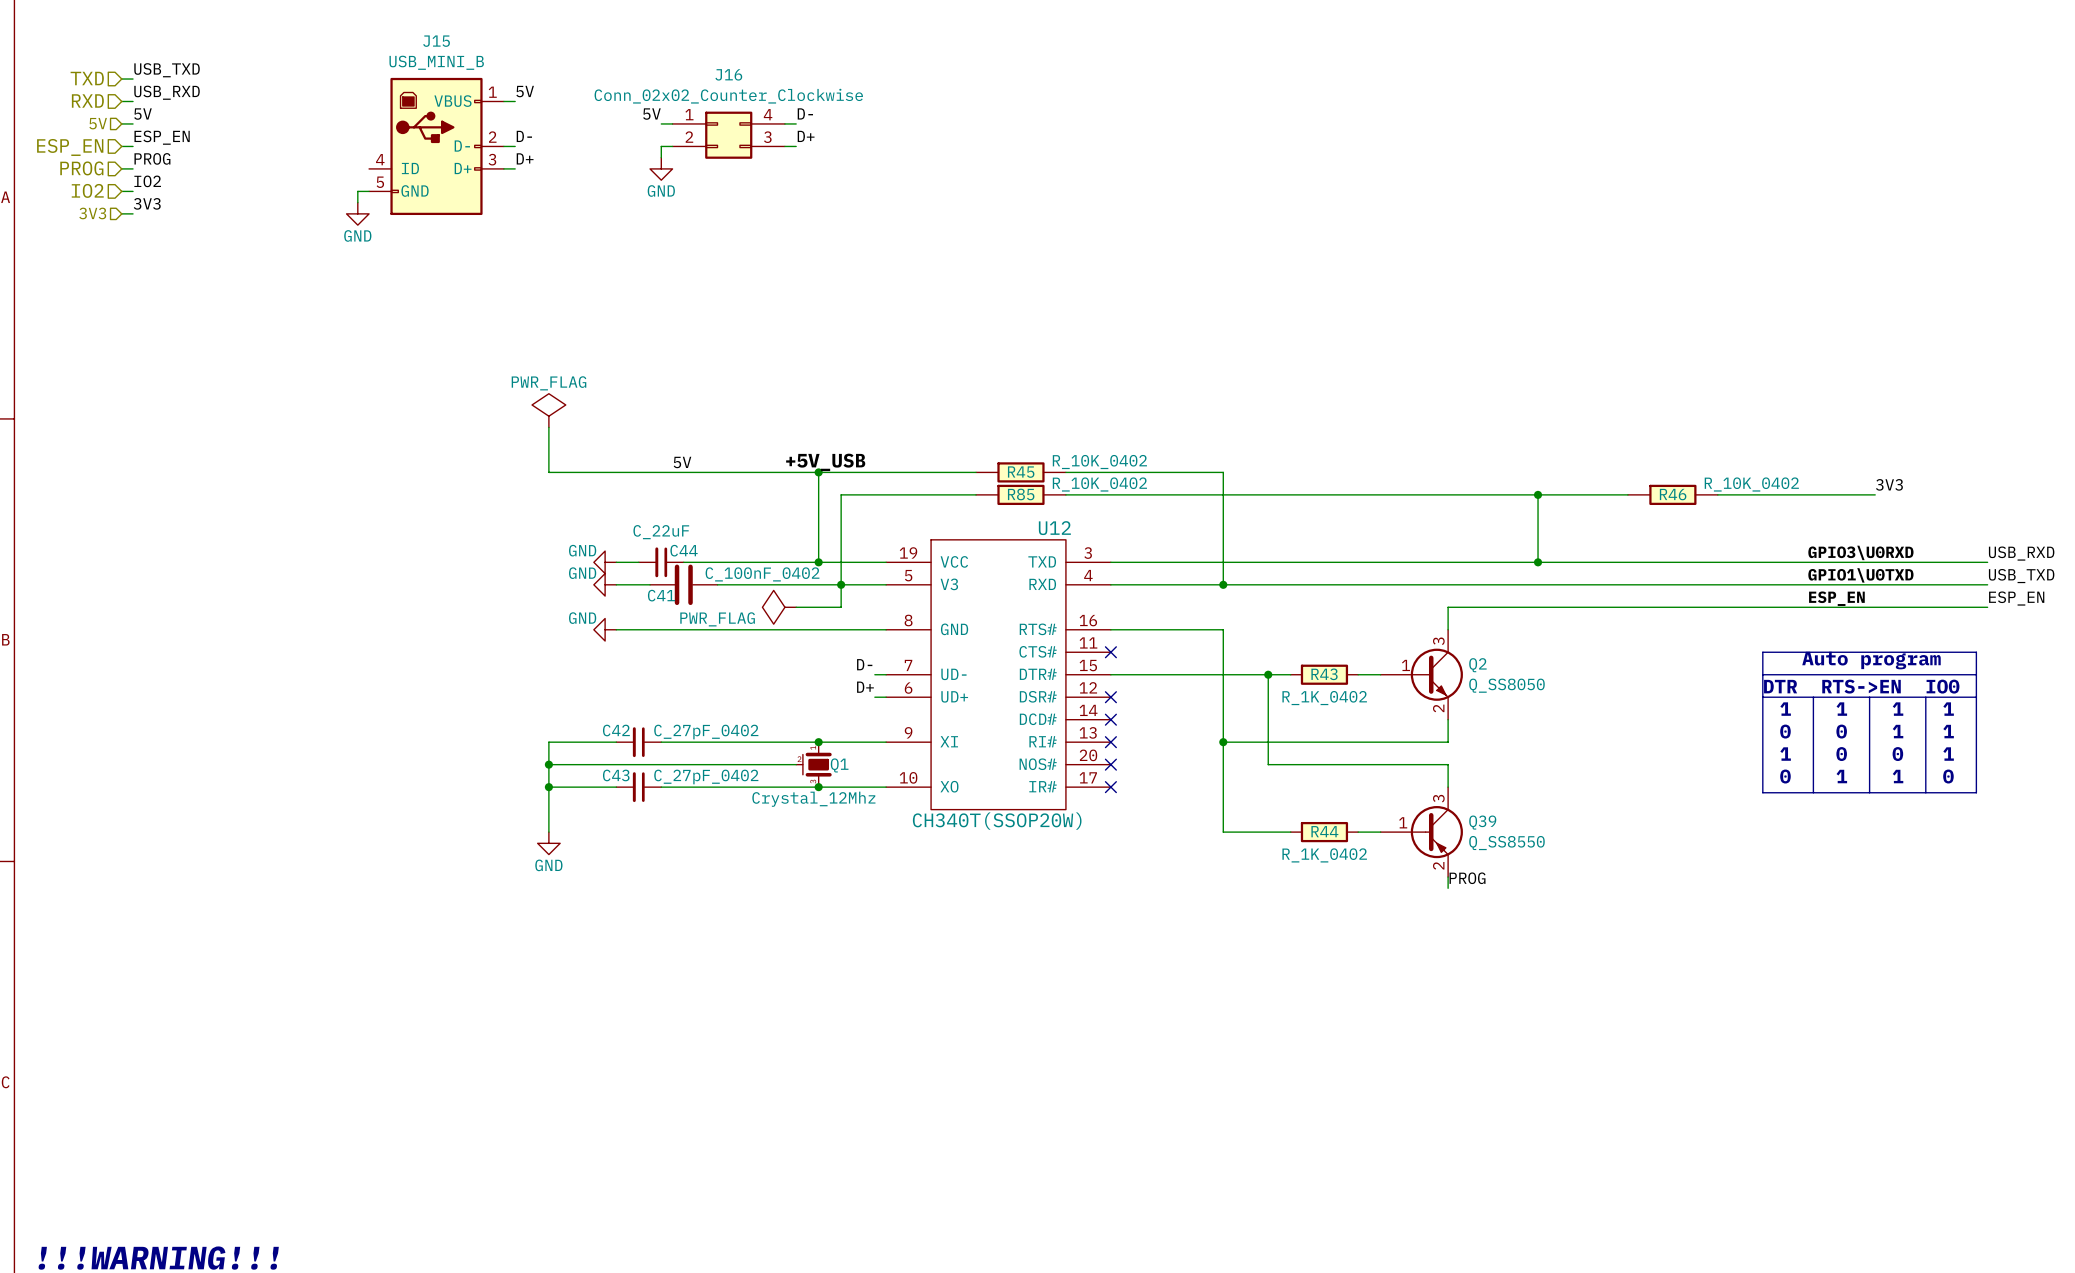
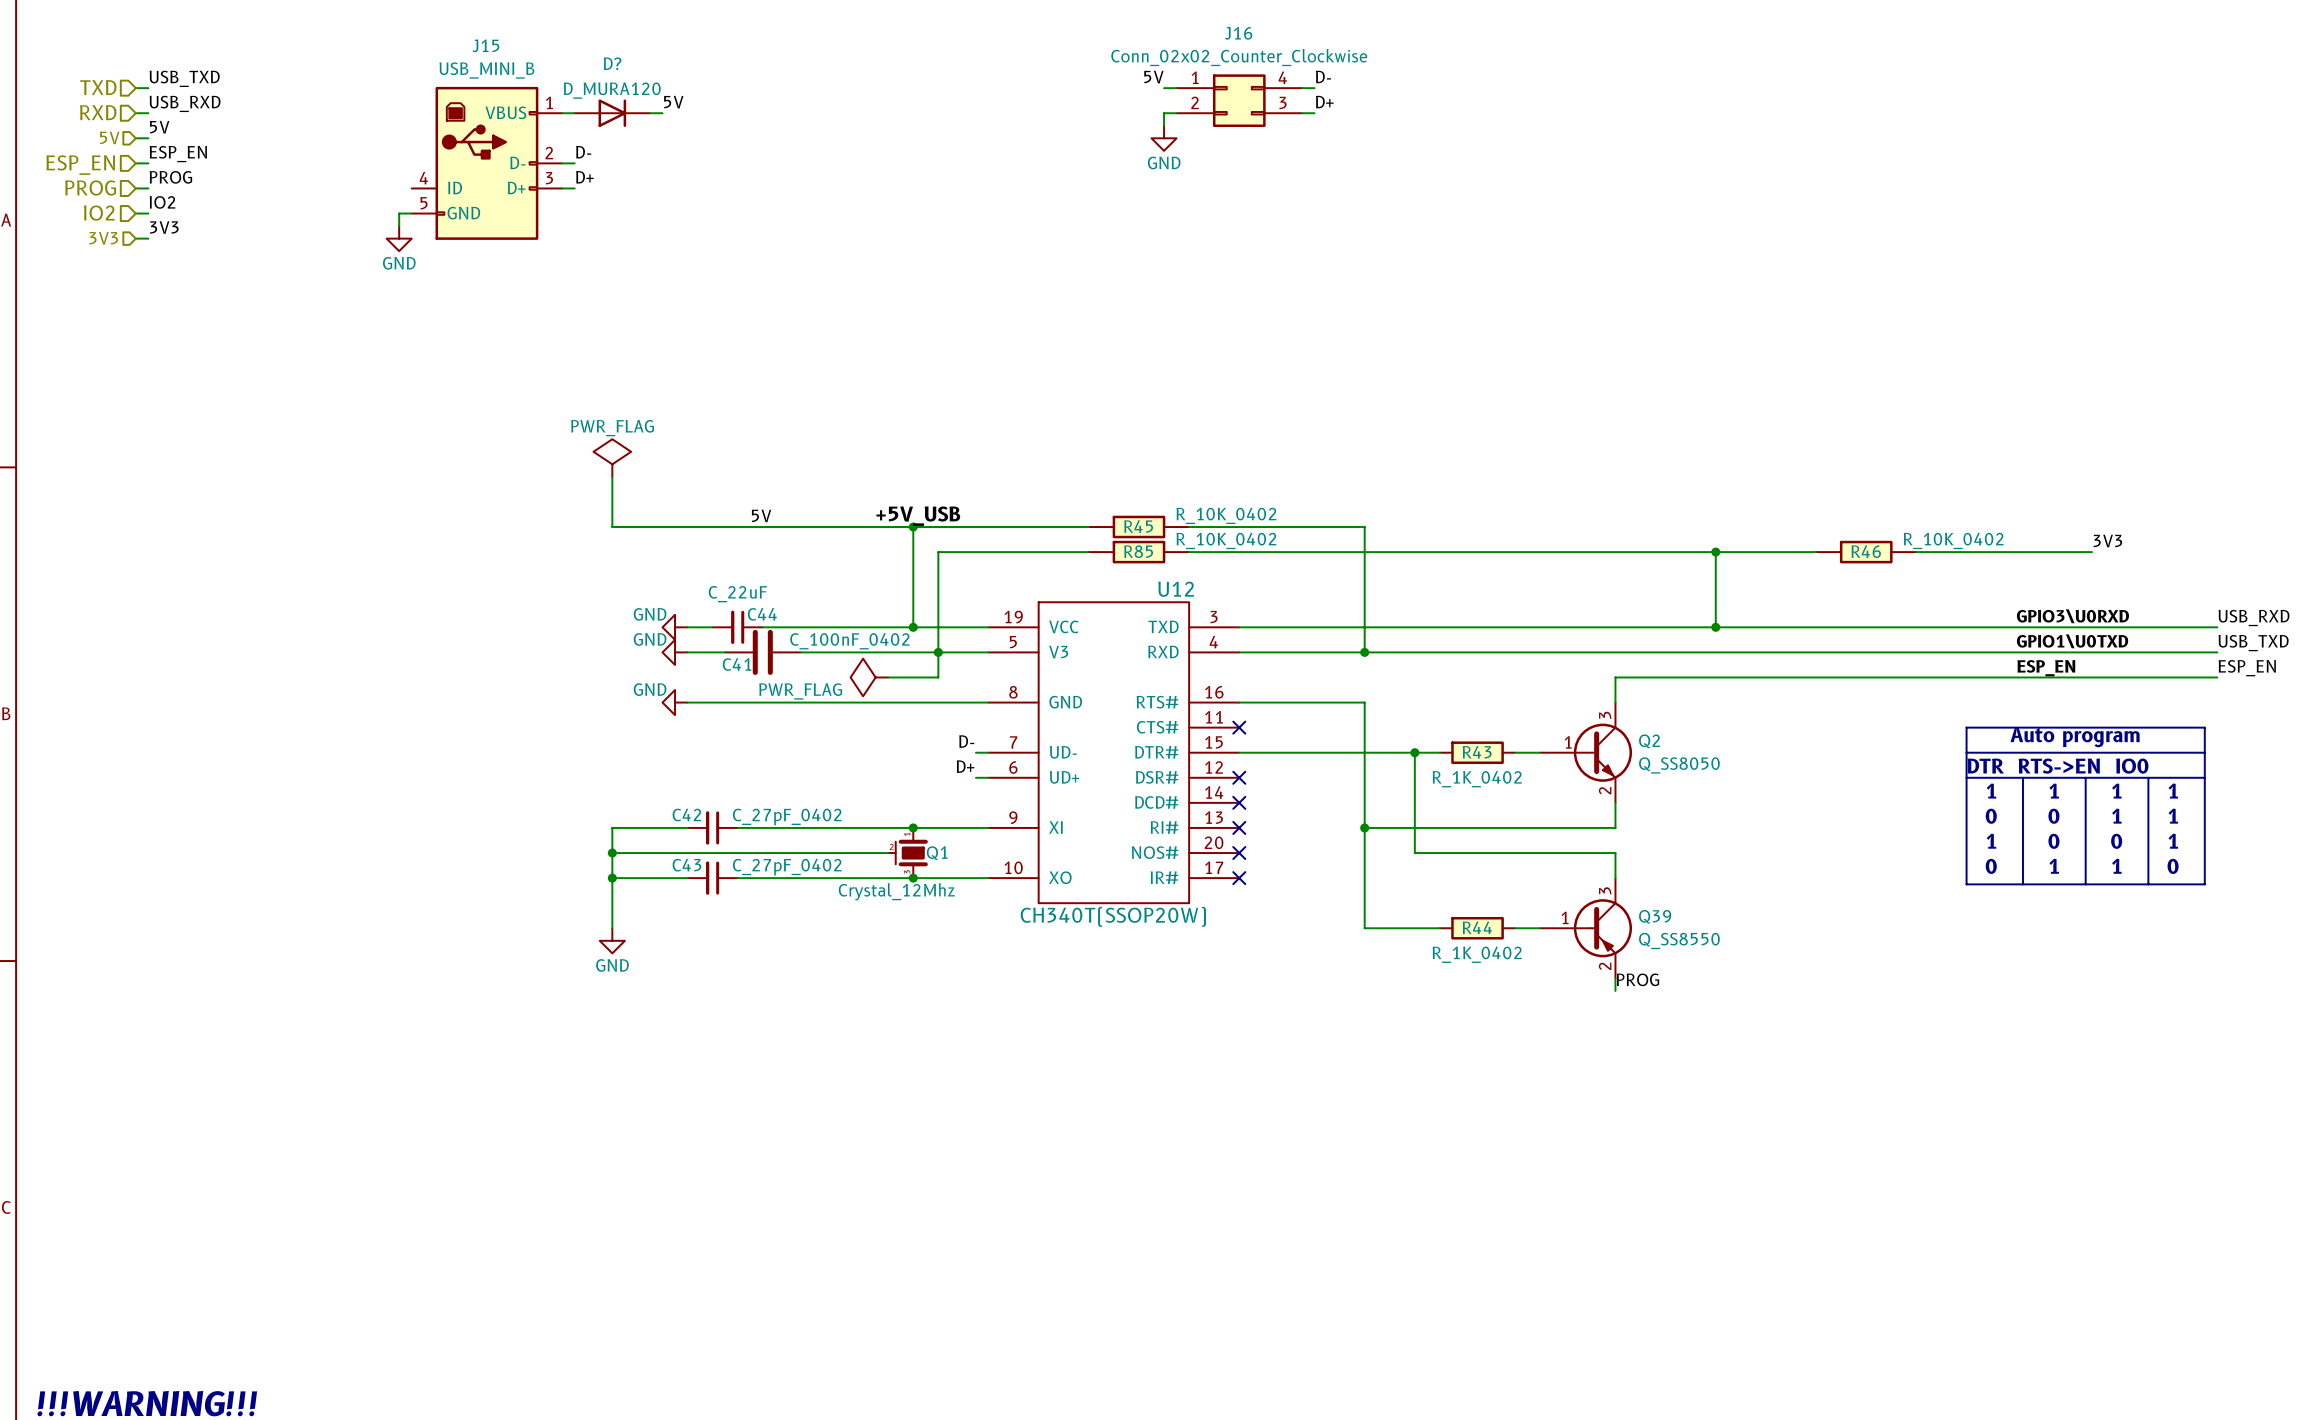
label: none -> D- (1323, 76)
label: none -> 5V (1153, 77)
wire: none -> (1164, 88) (1176, 88)
wire: none -> (1301, 88) (1314, 88)
label: 5V (525, 91) -> none
label: none -> 5V (673, 102)
label: none -> D+ (1324, 102)
D?: none -> D_MURA120 (612, 113)
wire: none -> (1176, 113) (1164, 113) (1164, 125)
wire: none -> (1301, 113) (1314, 113)
label: D- (805, 113) -> none
label: 5V (651, 114) -> none
wire: (661, 123) (672, 123) -> (649, 113) (662, 113)
wire: (784, 123) (796, 123) -> none
power symbol: none -> GND (1164, 138)
J16 position: (728, 135) -> (1239, 100)
label: D+ (806, 136) -> none
wire: (672, 146) (661, 146) (661, 157) -> none
wire: (784, 146) (796, 146) -> none
power symbol: GND (661, 168) -> none

